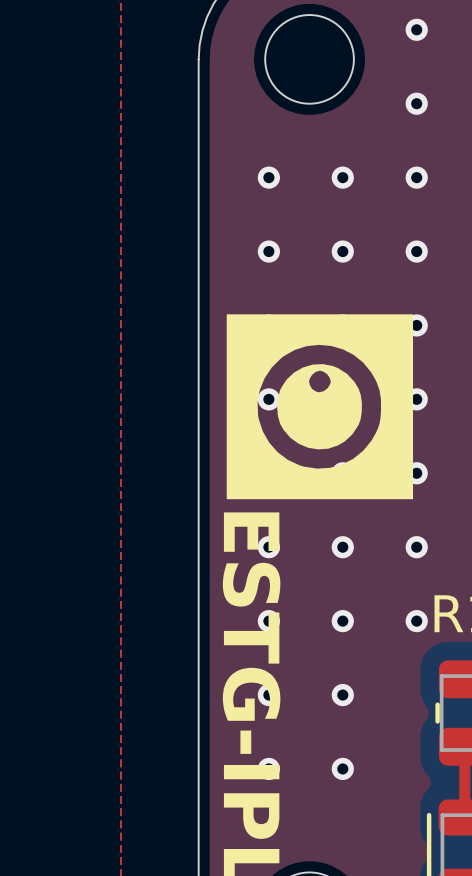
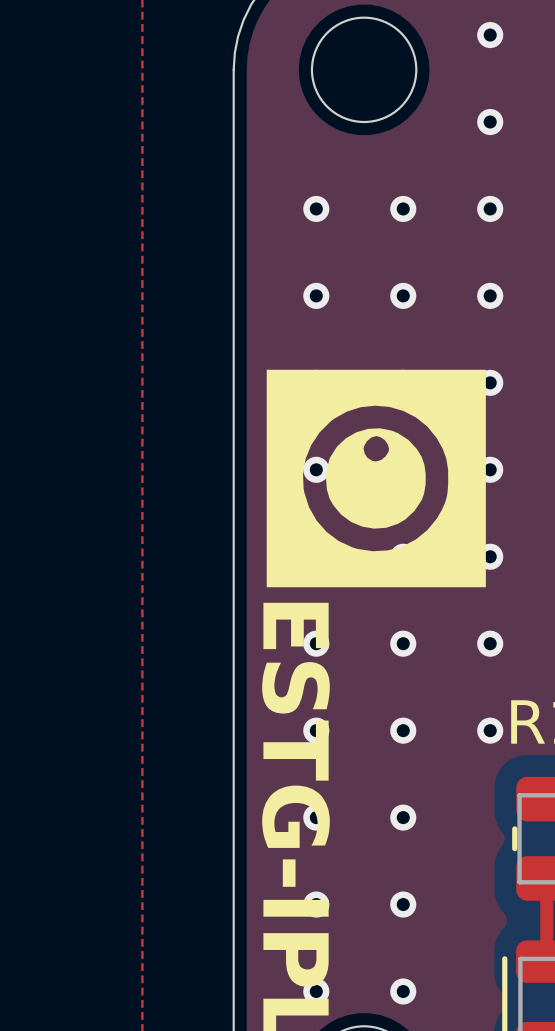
via: none -> (316, 991)
via: none -> (403, 991)

